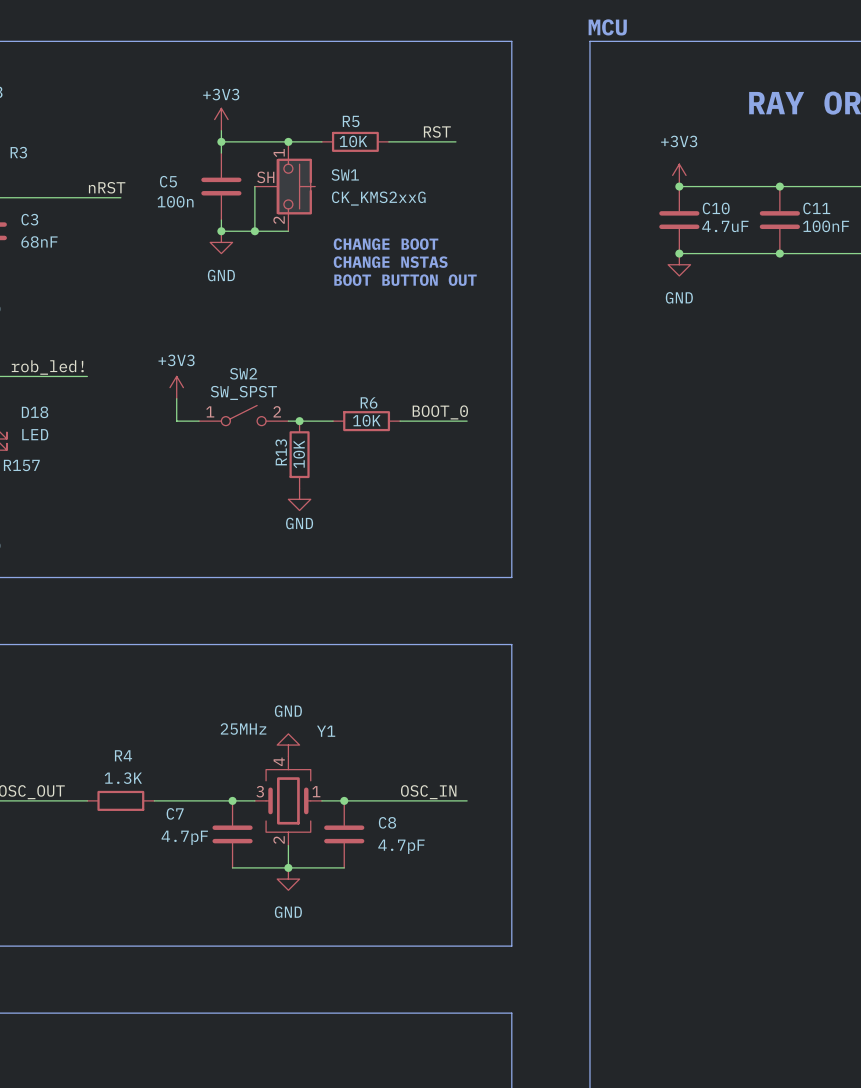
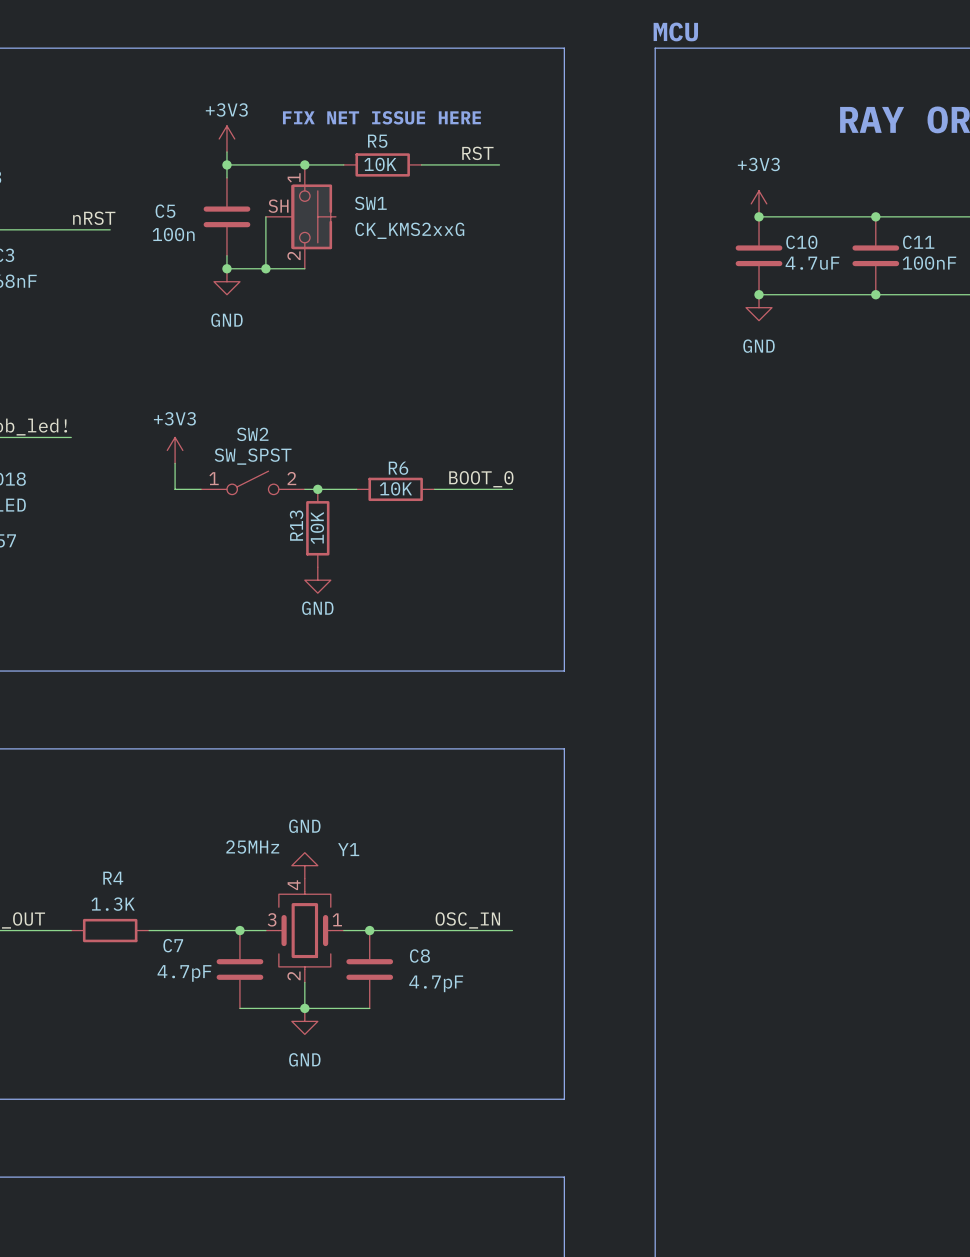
text: none -> FIX NET ISSUE HERE (381, 117)
text: CHANGE BOOT (386, 244) -> none
text: CHANGE NSTAS (390, 262) -> none
text: BOOT BUTTON OUT (405, 280) -> none

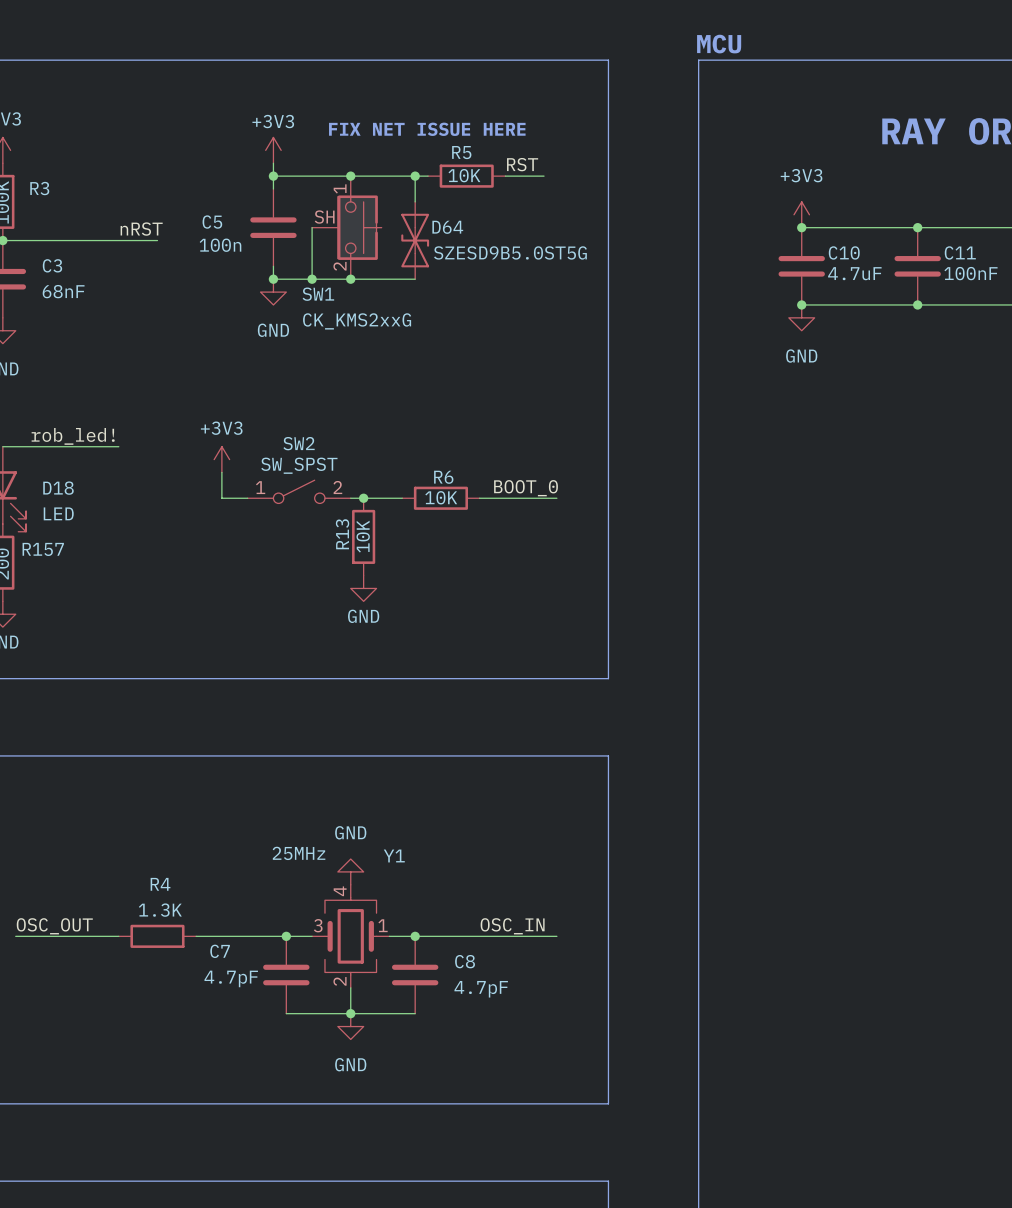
wire: none -> (415, 176) (415, 201)
junction: none -> (415, 176)
R5 position: (382, 164) -> (466, 176)
wire: (421, 164) (460, 164) -> (389, 176) (428, 176)
SW1 name position: SW1 (370, 203) -> SW1 (318, 294)
D64: none -> SZESD9B5.0ST5G (415, 240)
SW1 value position: CK_KMS2xxG (409, 230) -> CK_KMS2xxG (357, 321)
wire: none -> (350, 279) (415, 279)
junction: none -> (350, 279)

